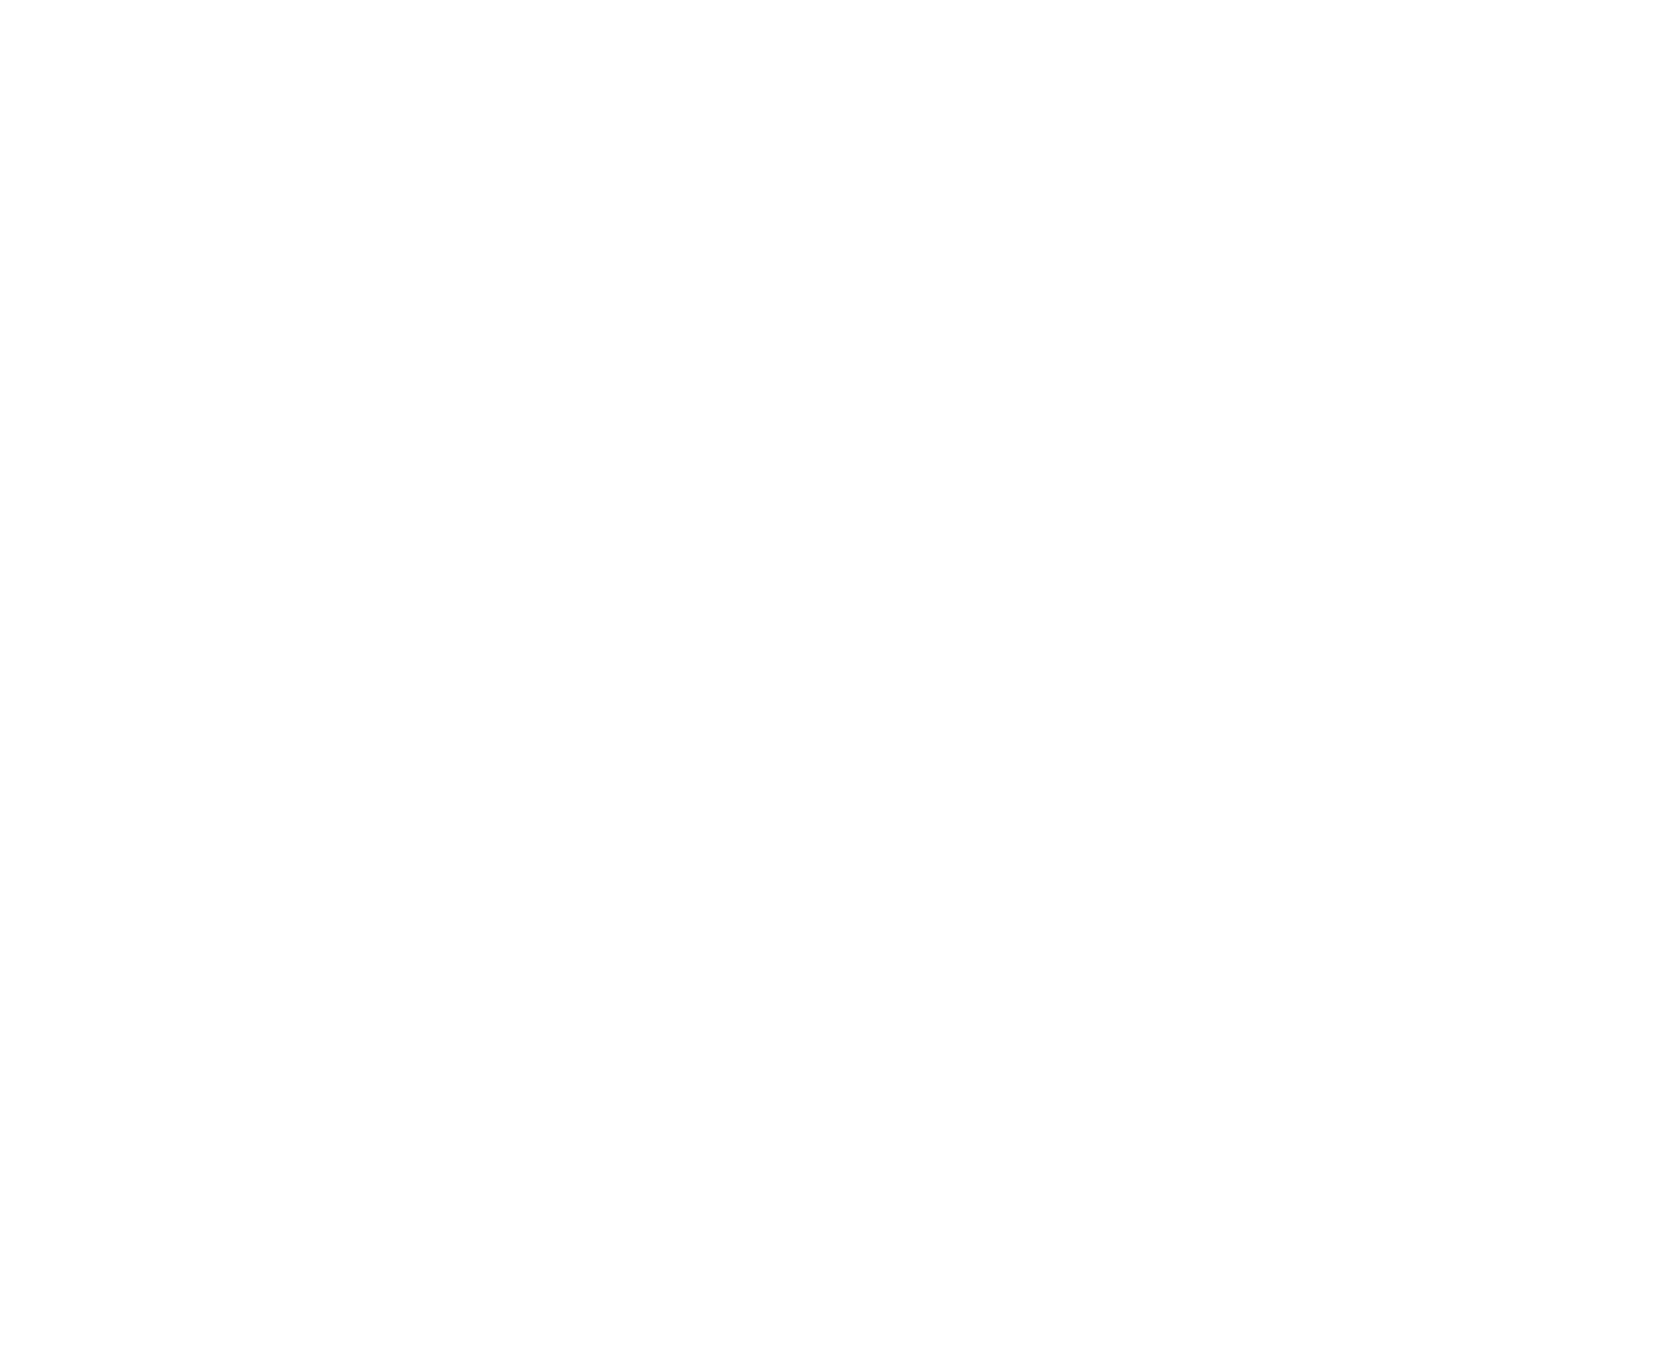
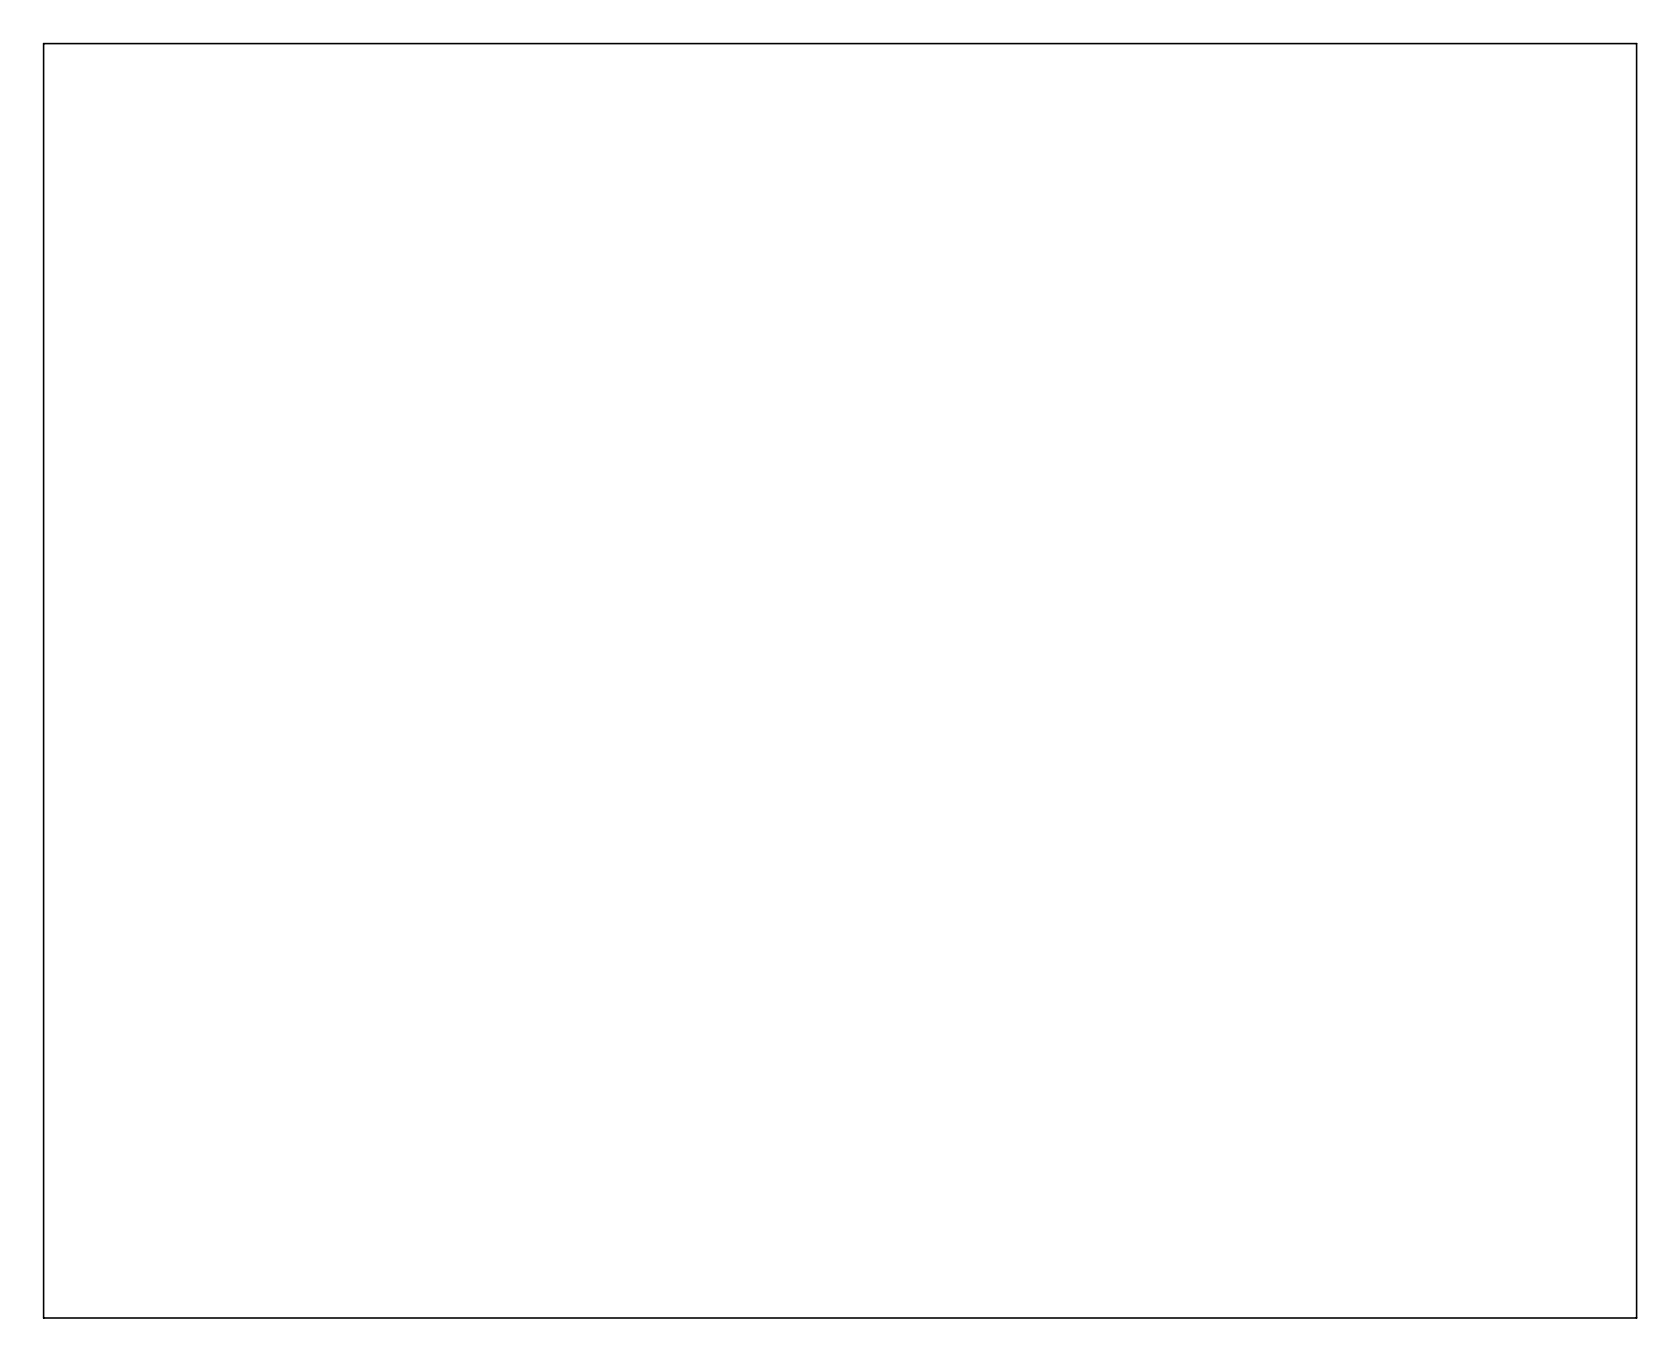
board edge: none -> (43, 43) (1636, 43) (1636, 1317) (43, 1317) (43, 43)

